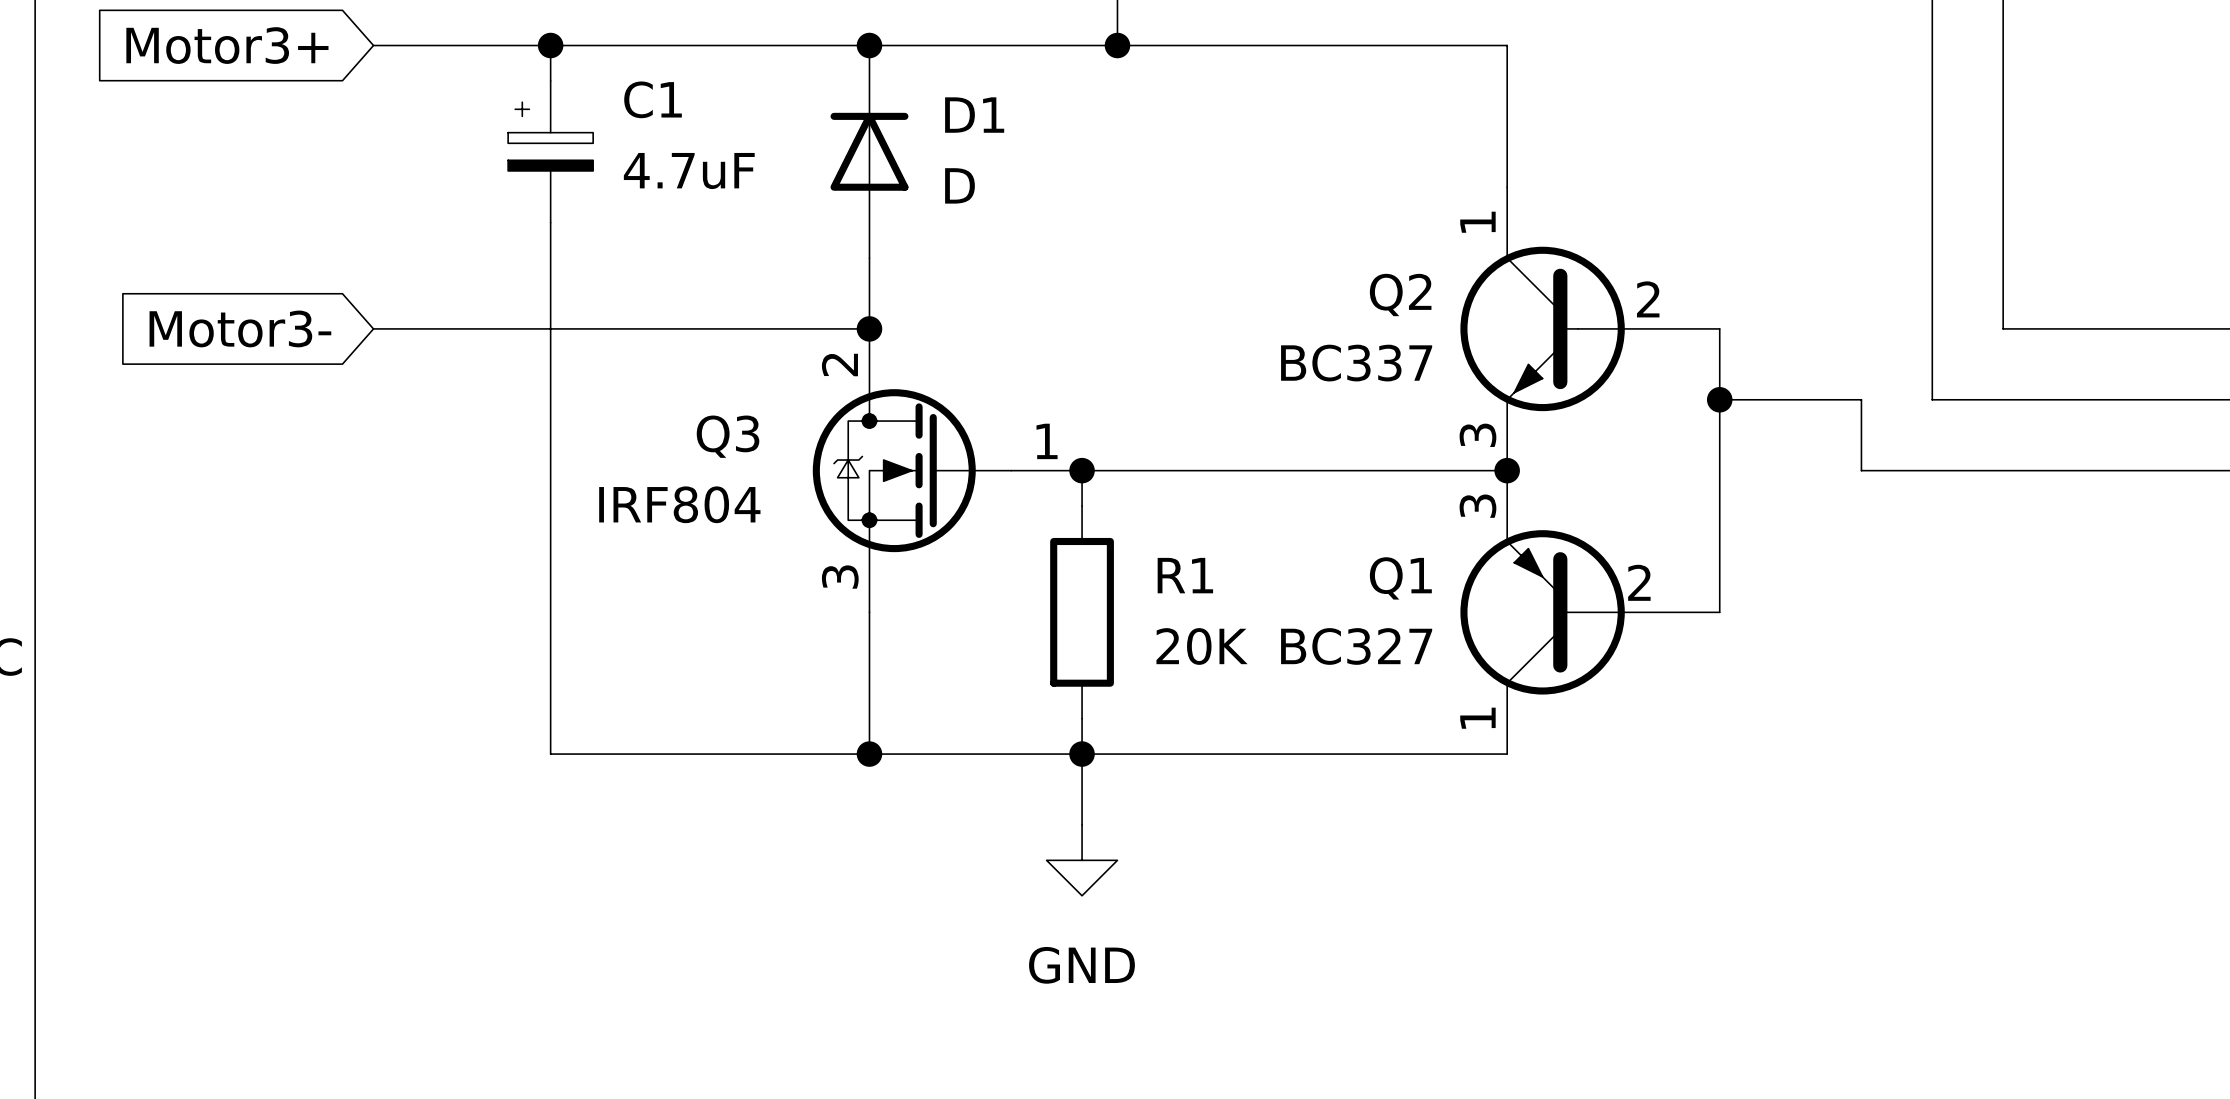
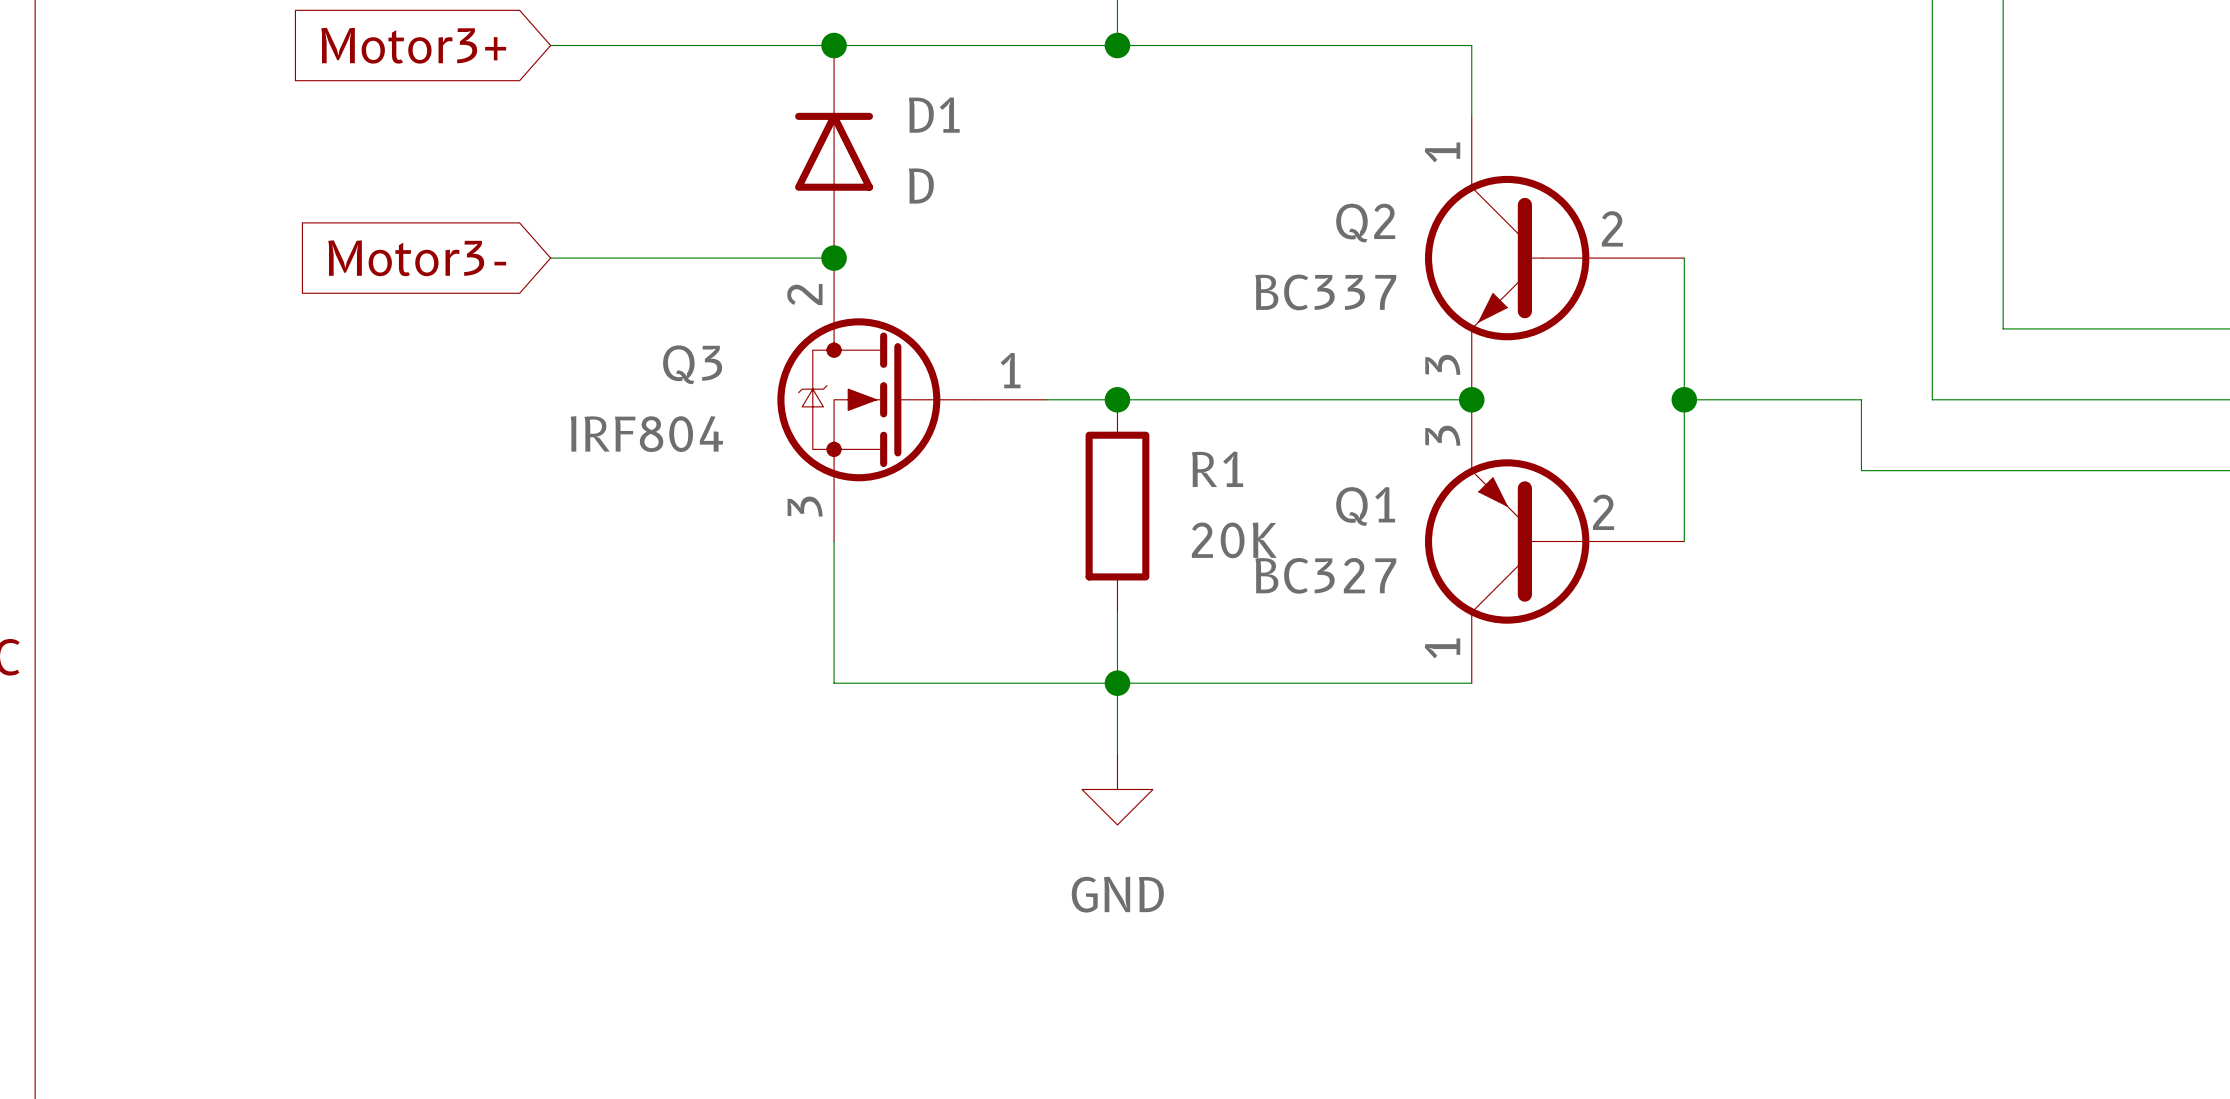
global label position: Motor3+ (227, 45) -> Motor3+ (413, 45)
wire: (373, 45) (550, 45) (550, 80) -> none
junction: (550, 45) -> none
junction position: (869, 45) -> (834, 45)
wire: (1471, 45) (1507, 45) (1507, 187) -> (1471, 45) (1471, 116)
C1: 4.7uF (550, 151) -> none
D1 position: (869, 151) -> (834, 151)
wire: (550, 222) (550, 754) (1507, 754) -> none
wire: none -> (550, 258) (834, 258)
wire: (869, 258) (869, 328) (373, 328) -> none
global label position: Motor3- (240, 328) -> Motor3- (417, 258)
junction position: (869, 328) -> (834, 258)
Q2 position: (1590, 328) -> (1554, 258)
wire: (1719, 328) (1719, 612) -> (1684, 258) (1684, 541)
wire: none -> (1046, 399) (1471, 399)
wire: none -> (1684, 399) (1719, 399)
junction position: (1719, 399) -> (1684, 399)
Q3 position: (947, 470) -> (911, 399)
junction position: (1082, 470) -> (1117, 399)
wire: (1507, 470) (1082, 470) (1082, 506) -> none
junction position: (1507, 470) -> (1471, 399)
wire: none -> (834, 541) (834, 683) (1471, 683)
wire: (869, 612) (869, 754) -> (1117, 612) (1117, 754)
R1 position: (1082, 612) -> (1117, 506)
Q1 position: (1590, 612) -> (1554, 541)
wire: (1082, 718) (1082, 824) -> none
junction: (869, 754) -> none
junction position: (1082, 754) -> (1117, 683)
power symbol position: GND (1082, 860) -> GND (1117, 789)

